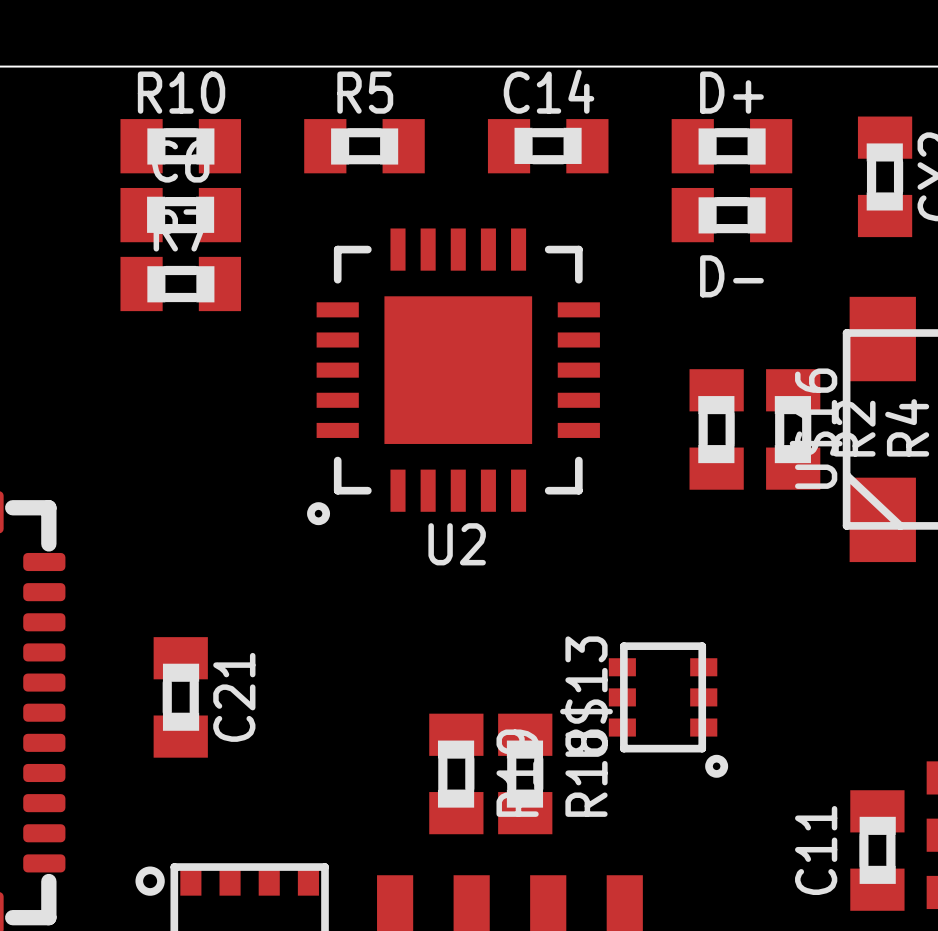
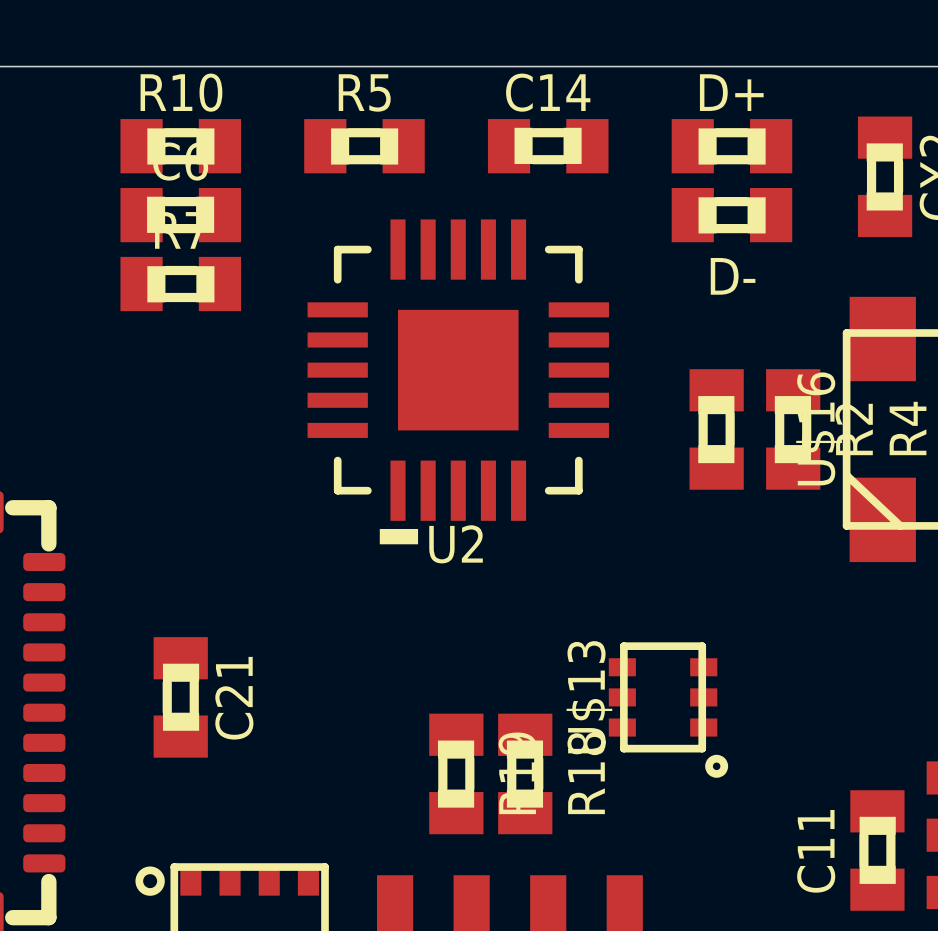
U2 footprint: [307, 228, 600, 526] -> [307, 219, 609, 545]

